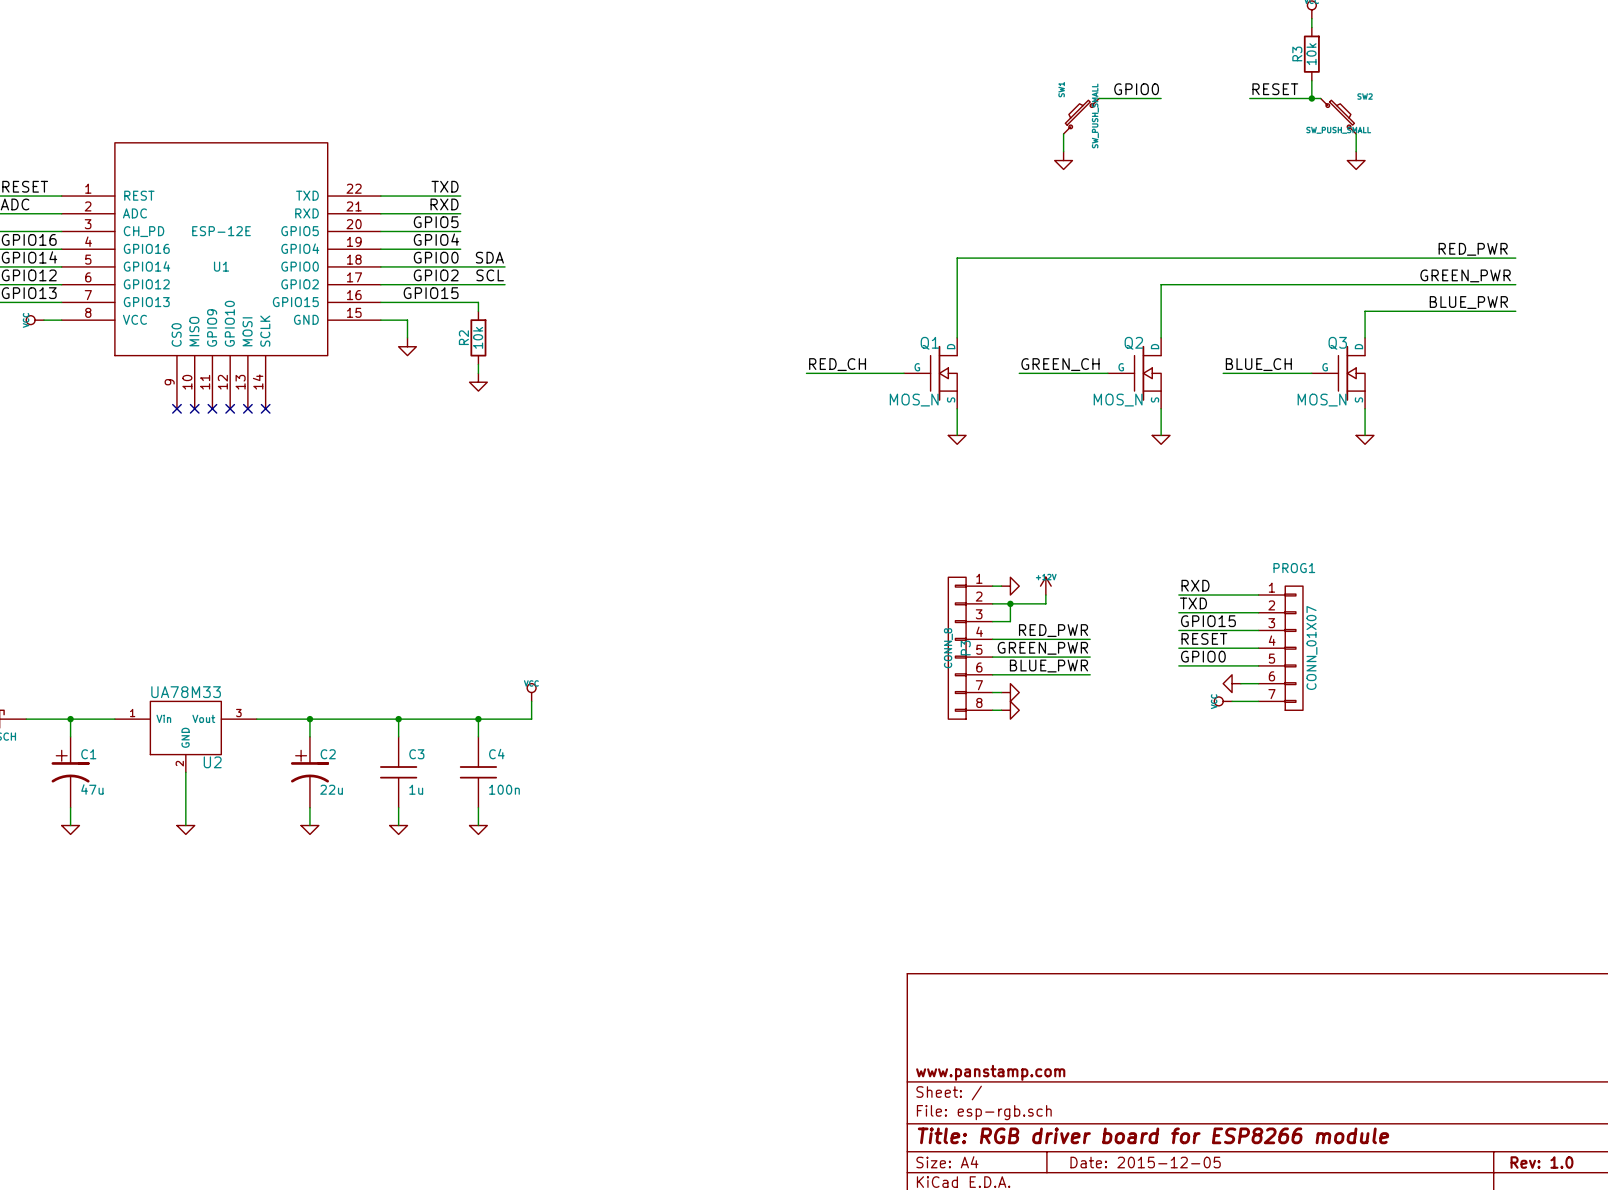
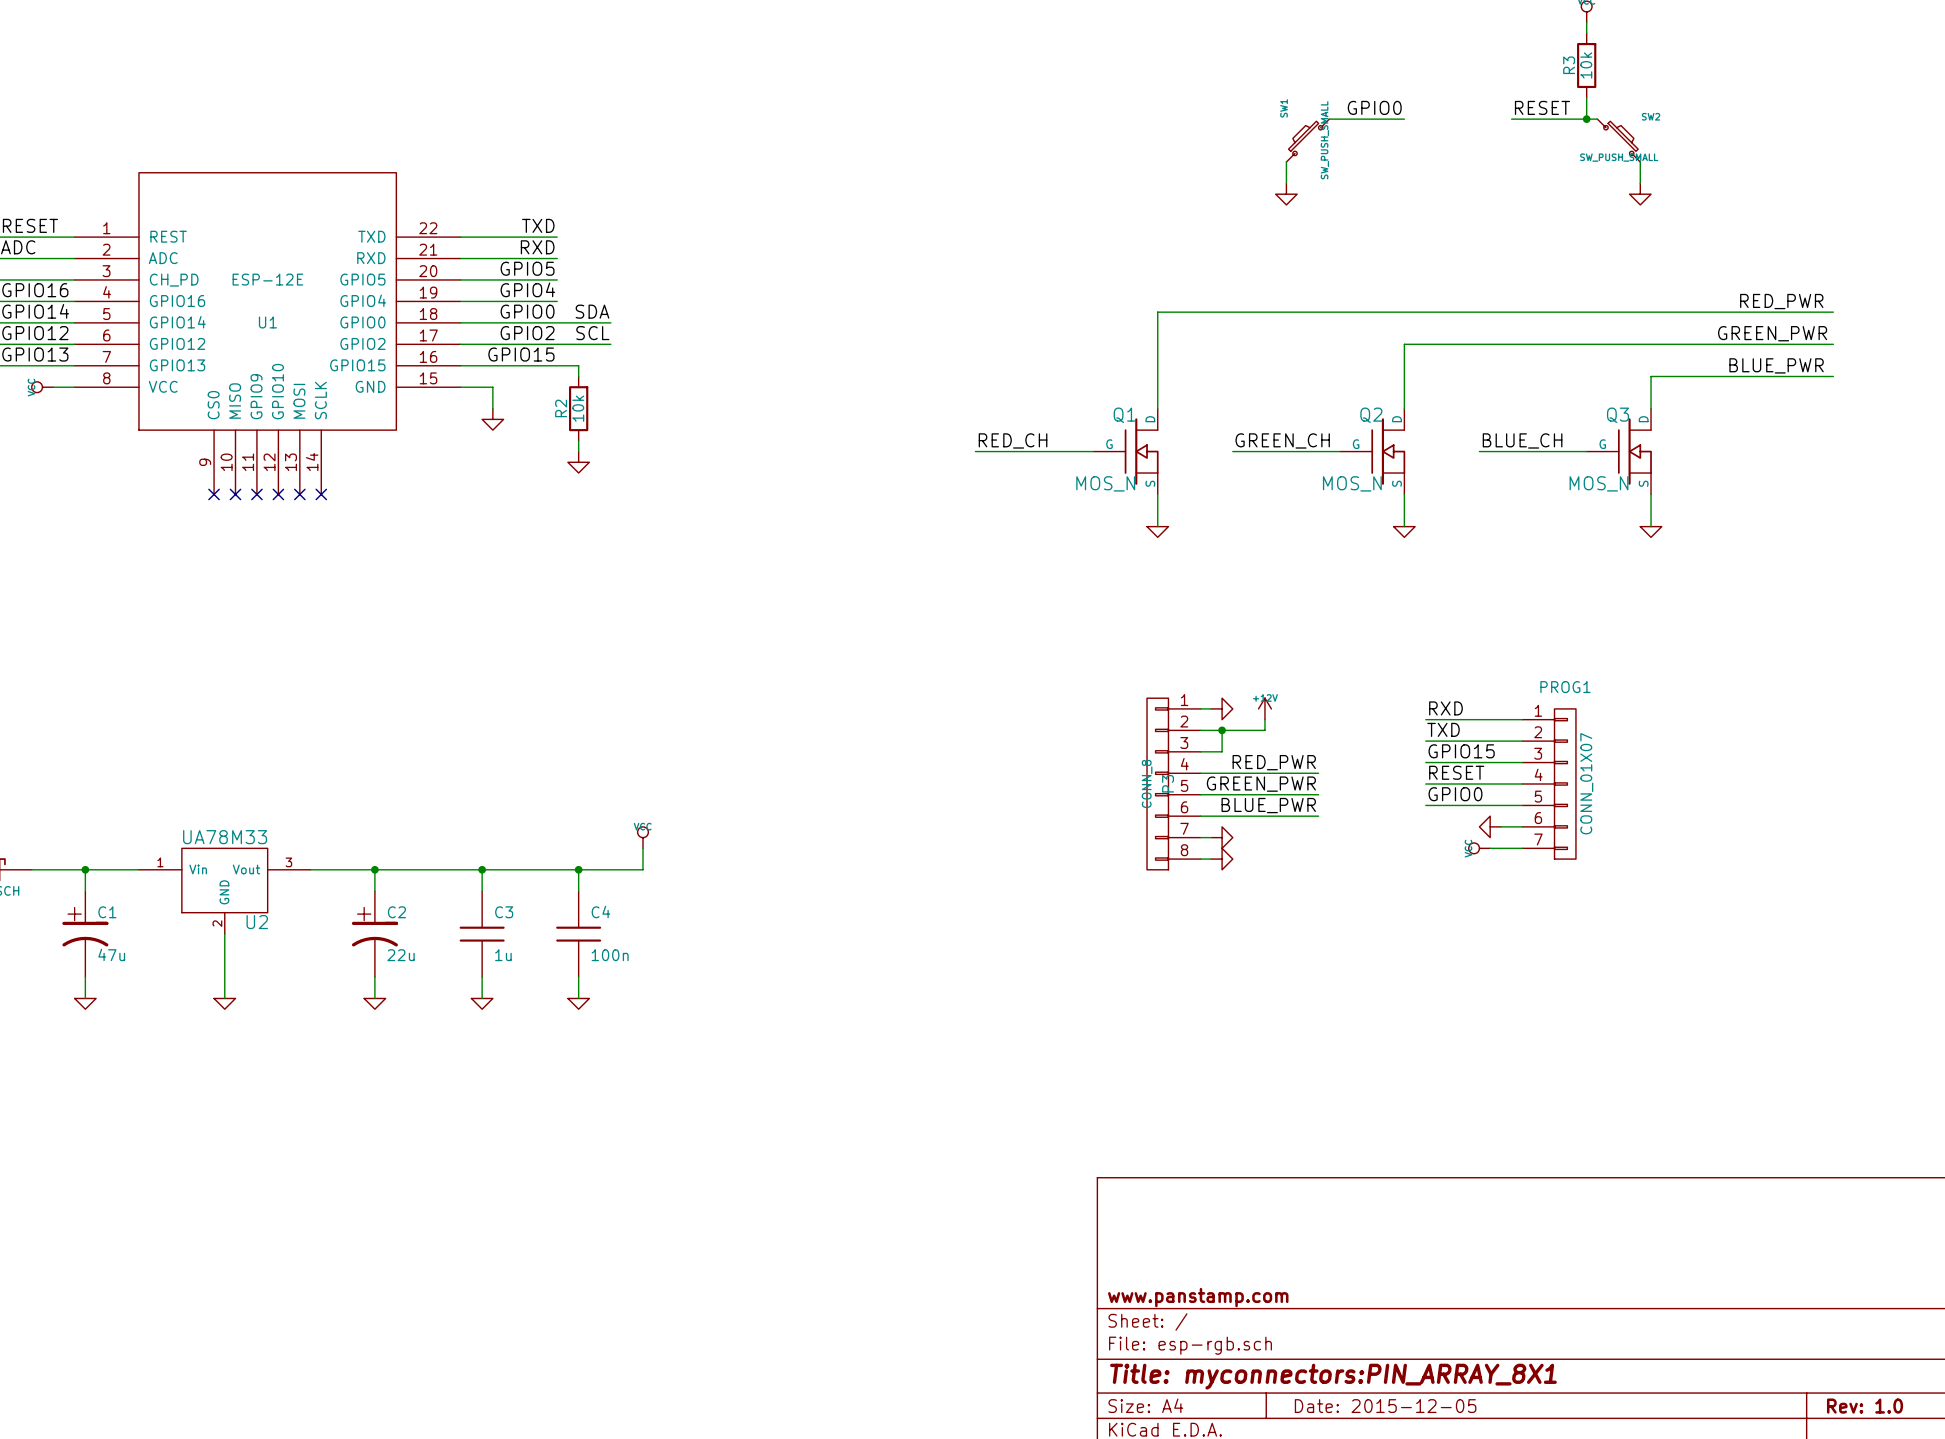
title block: Title: RGB driver board for ESP8266 module (1153, 1135) -> Title: myconnectors:PIN_ARRAY_8X1 (1333, 1376)

